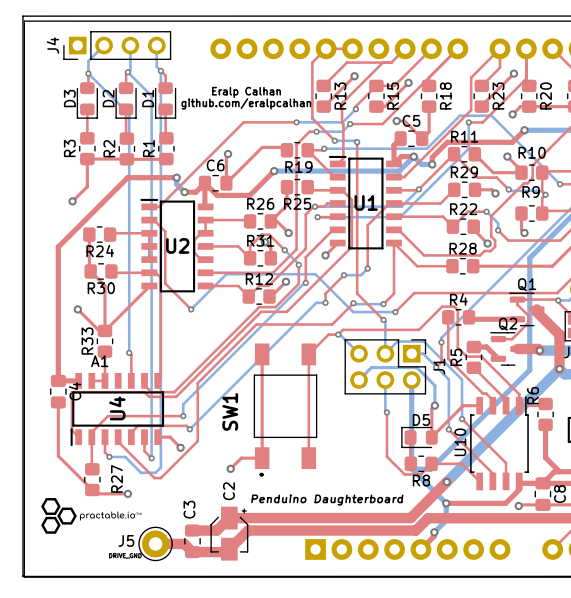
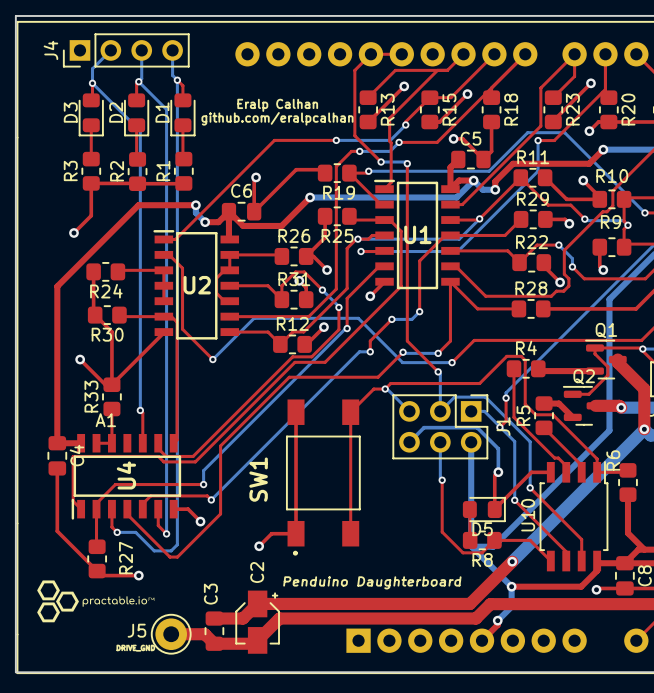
D5 rotation: 0° (419, 437) -> 180° (484, 509)

